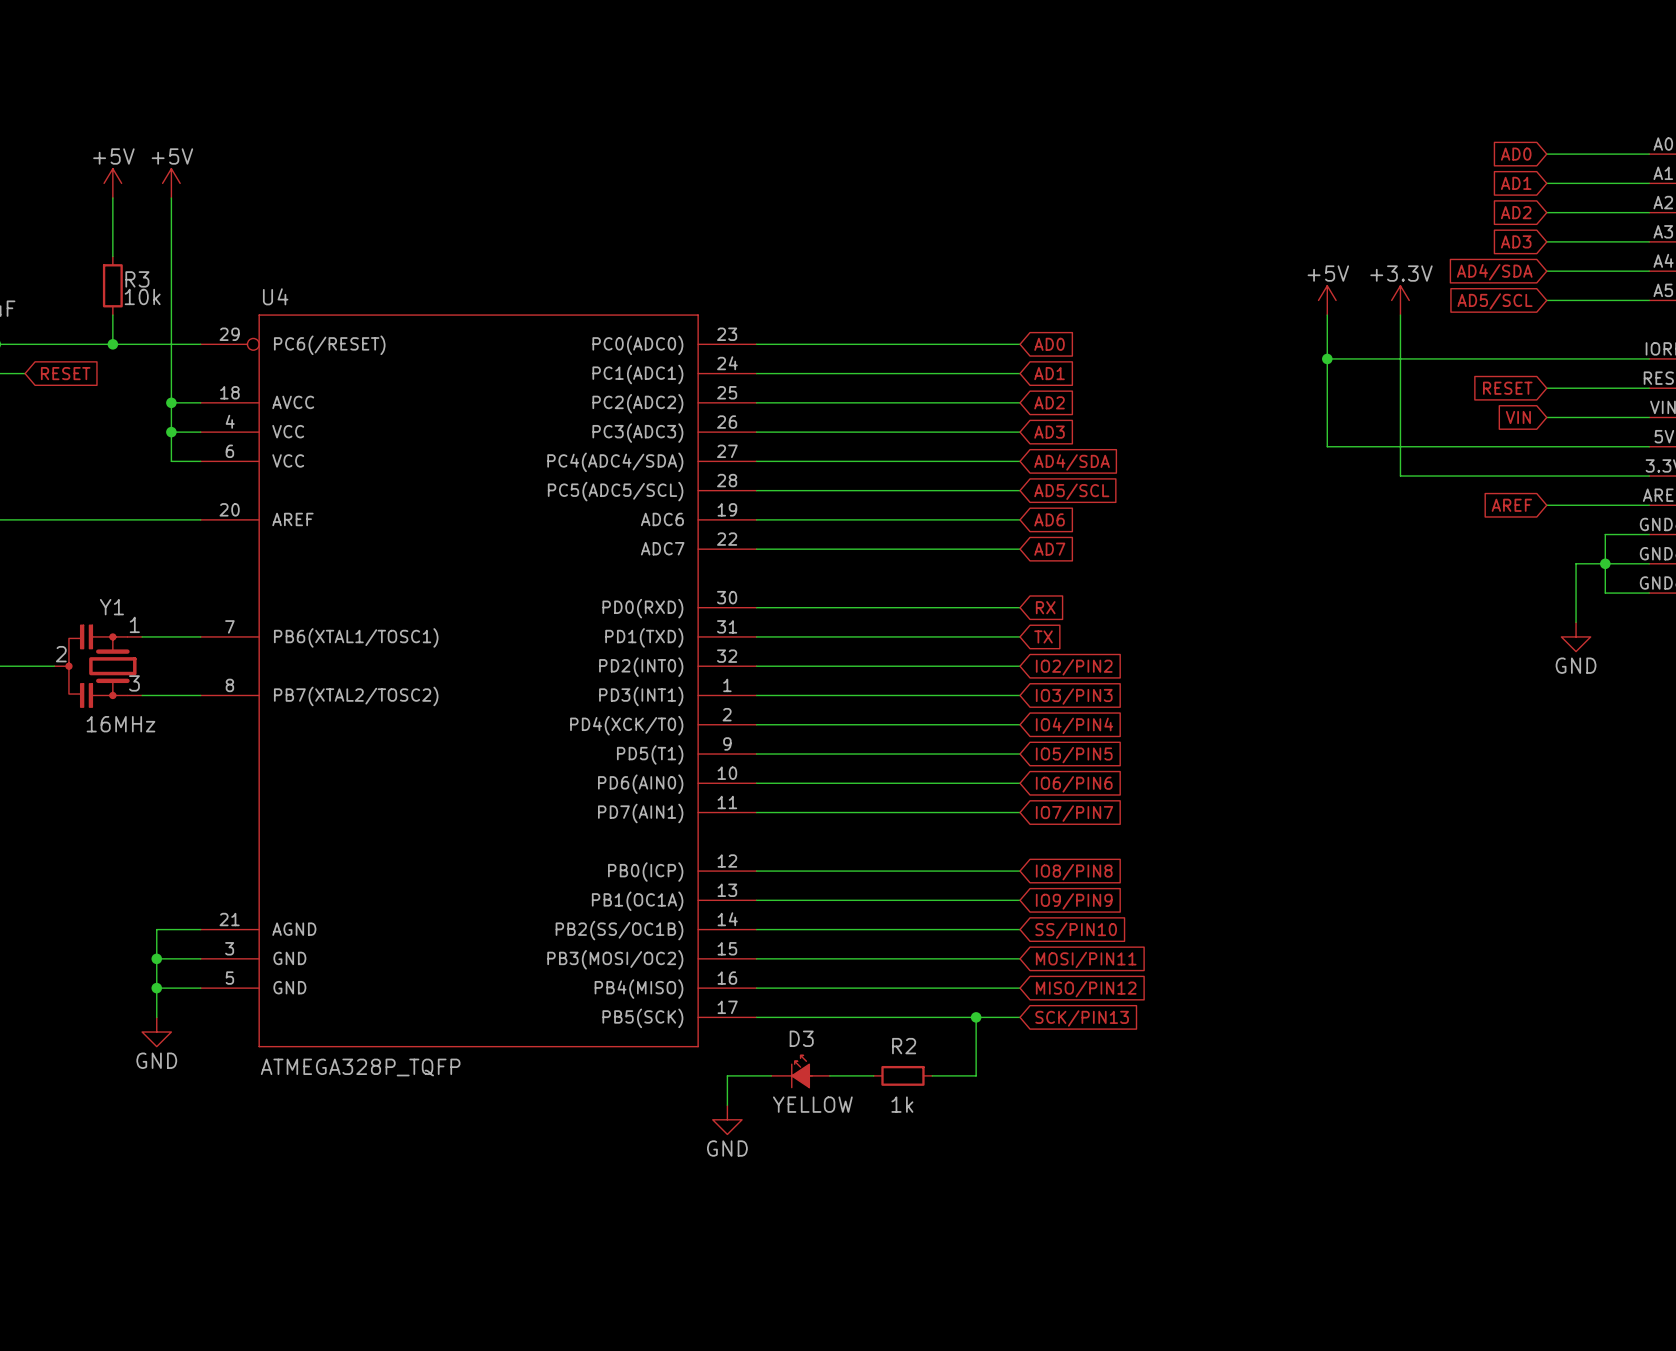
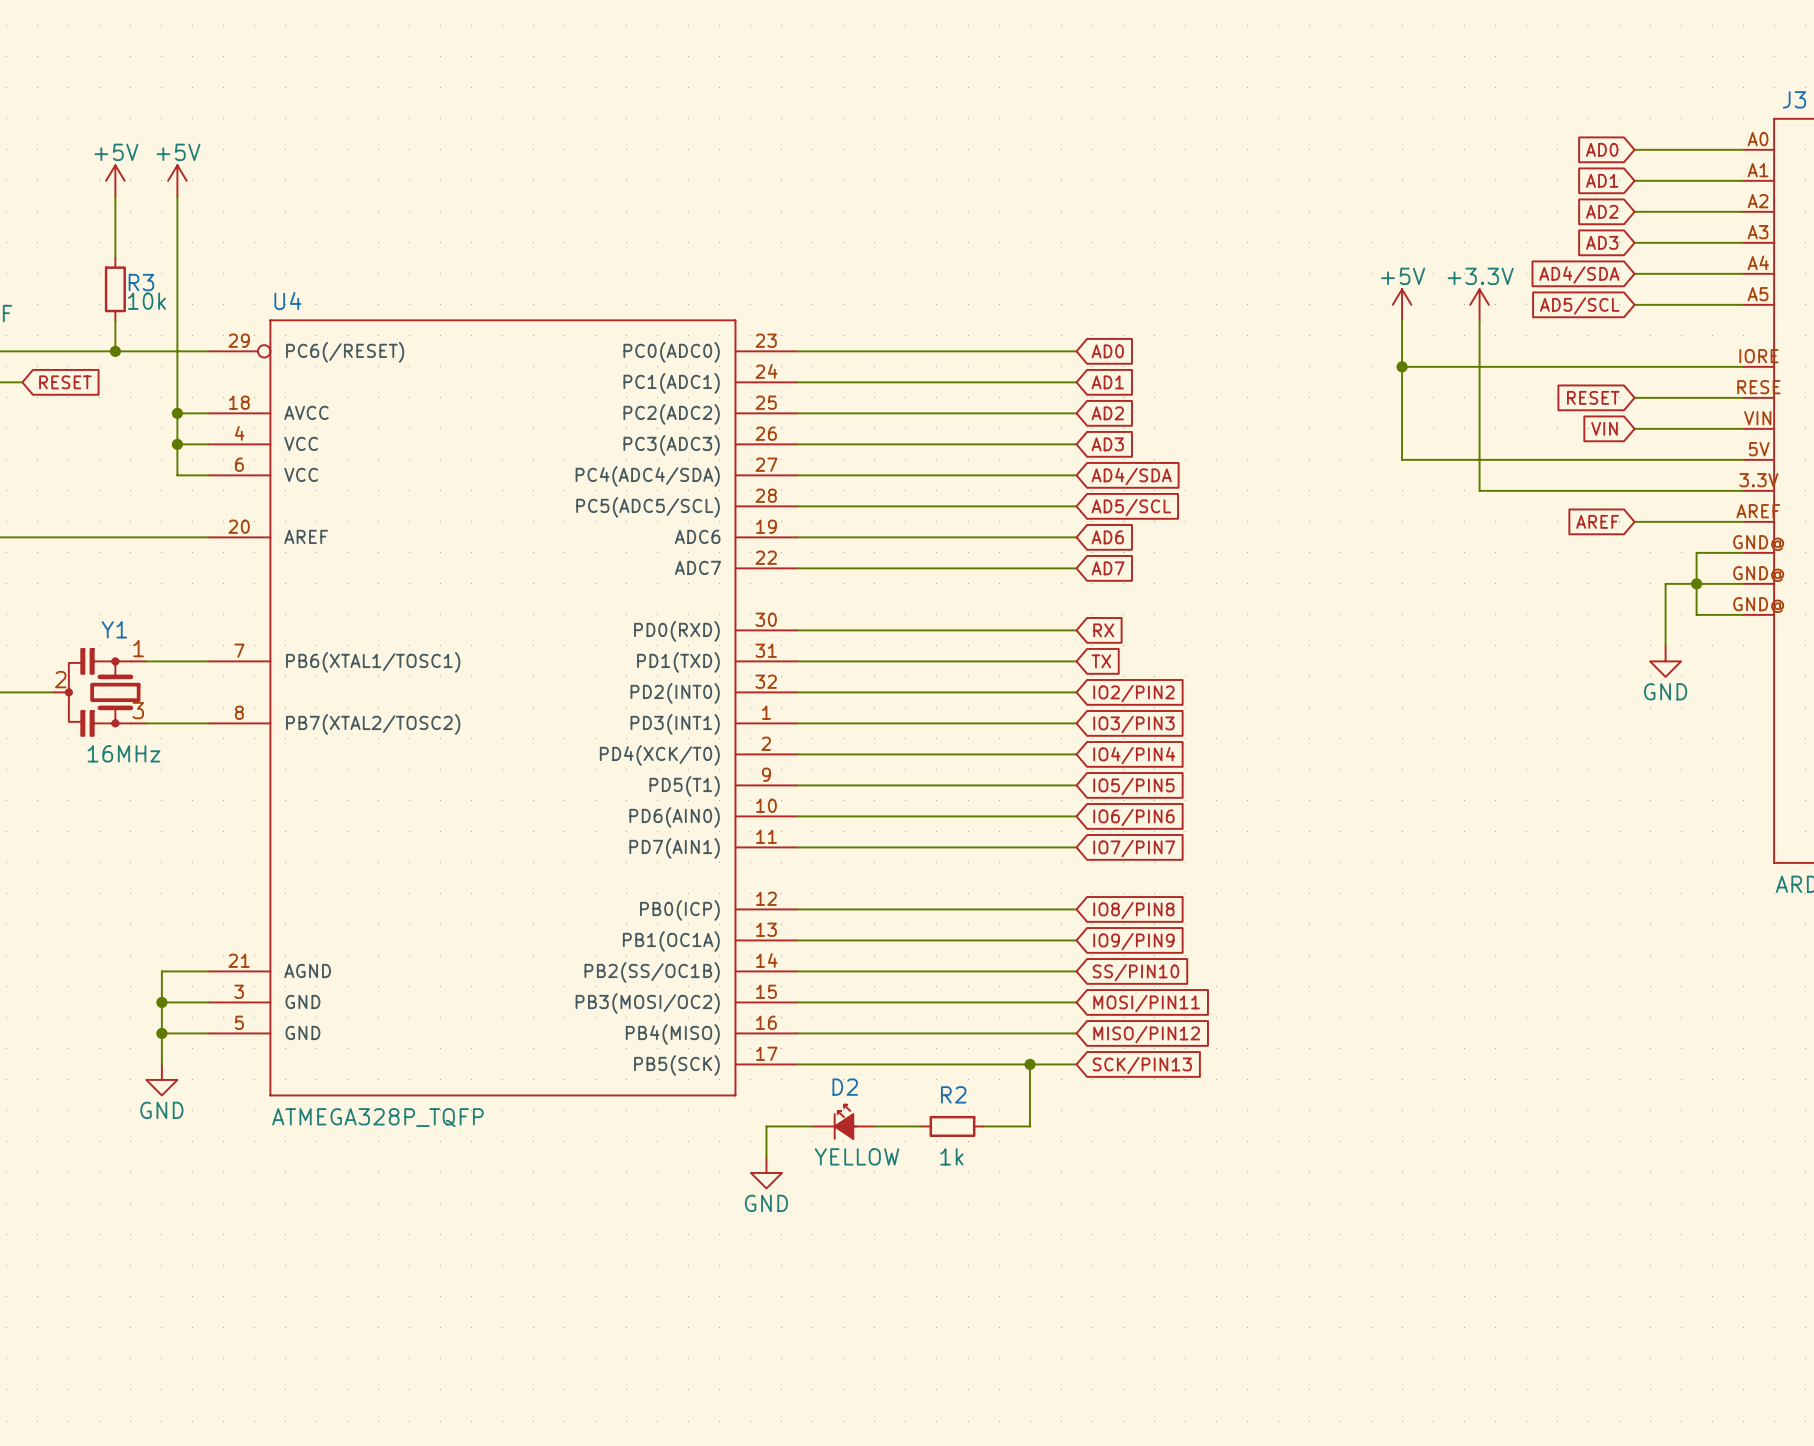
D3 name: D3 (801, 1038) -> D2 (845, 1087)

